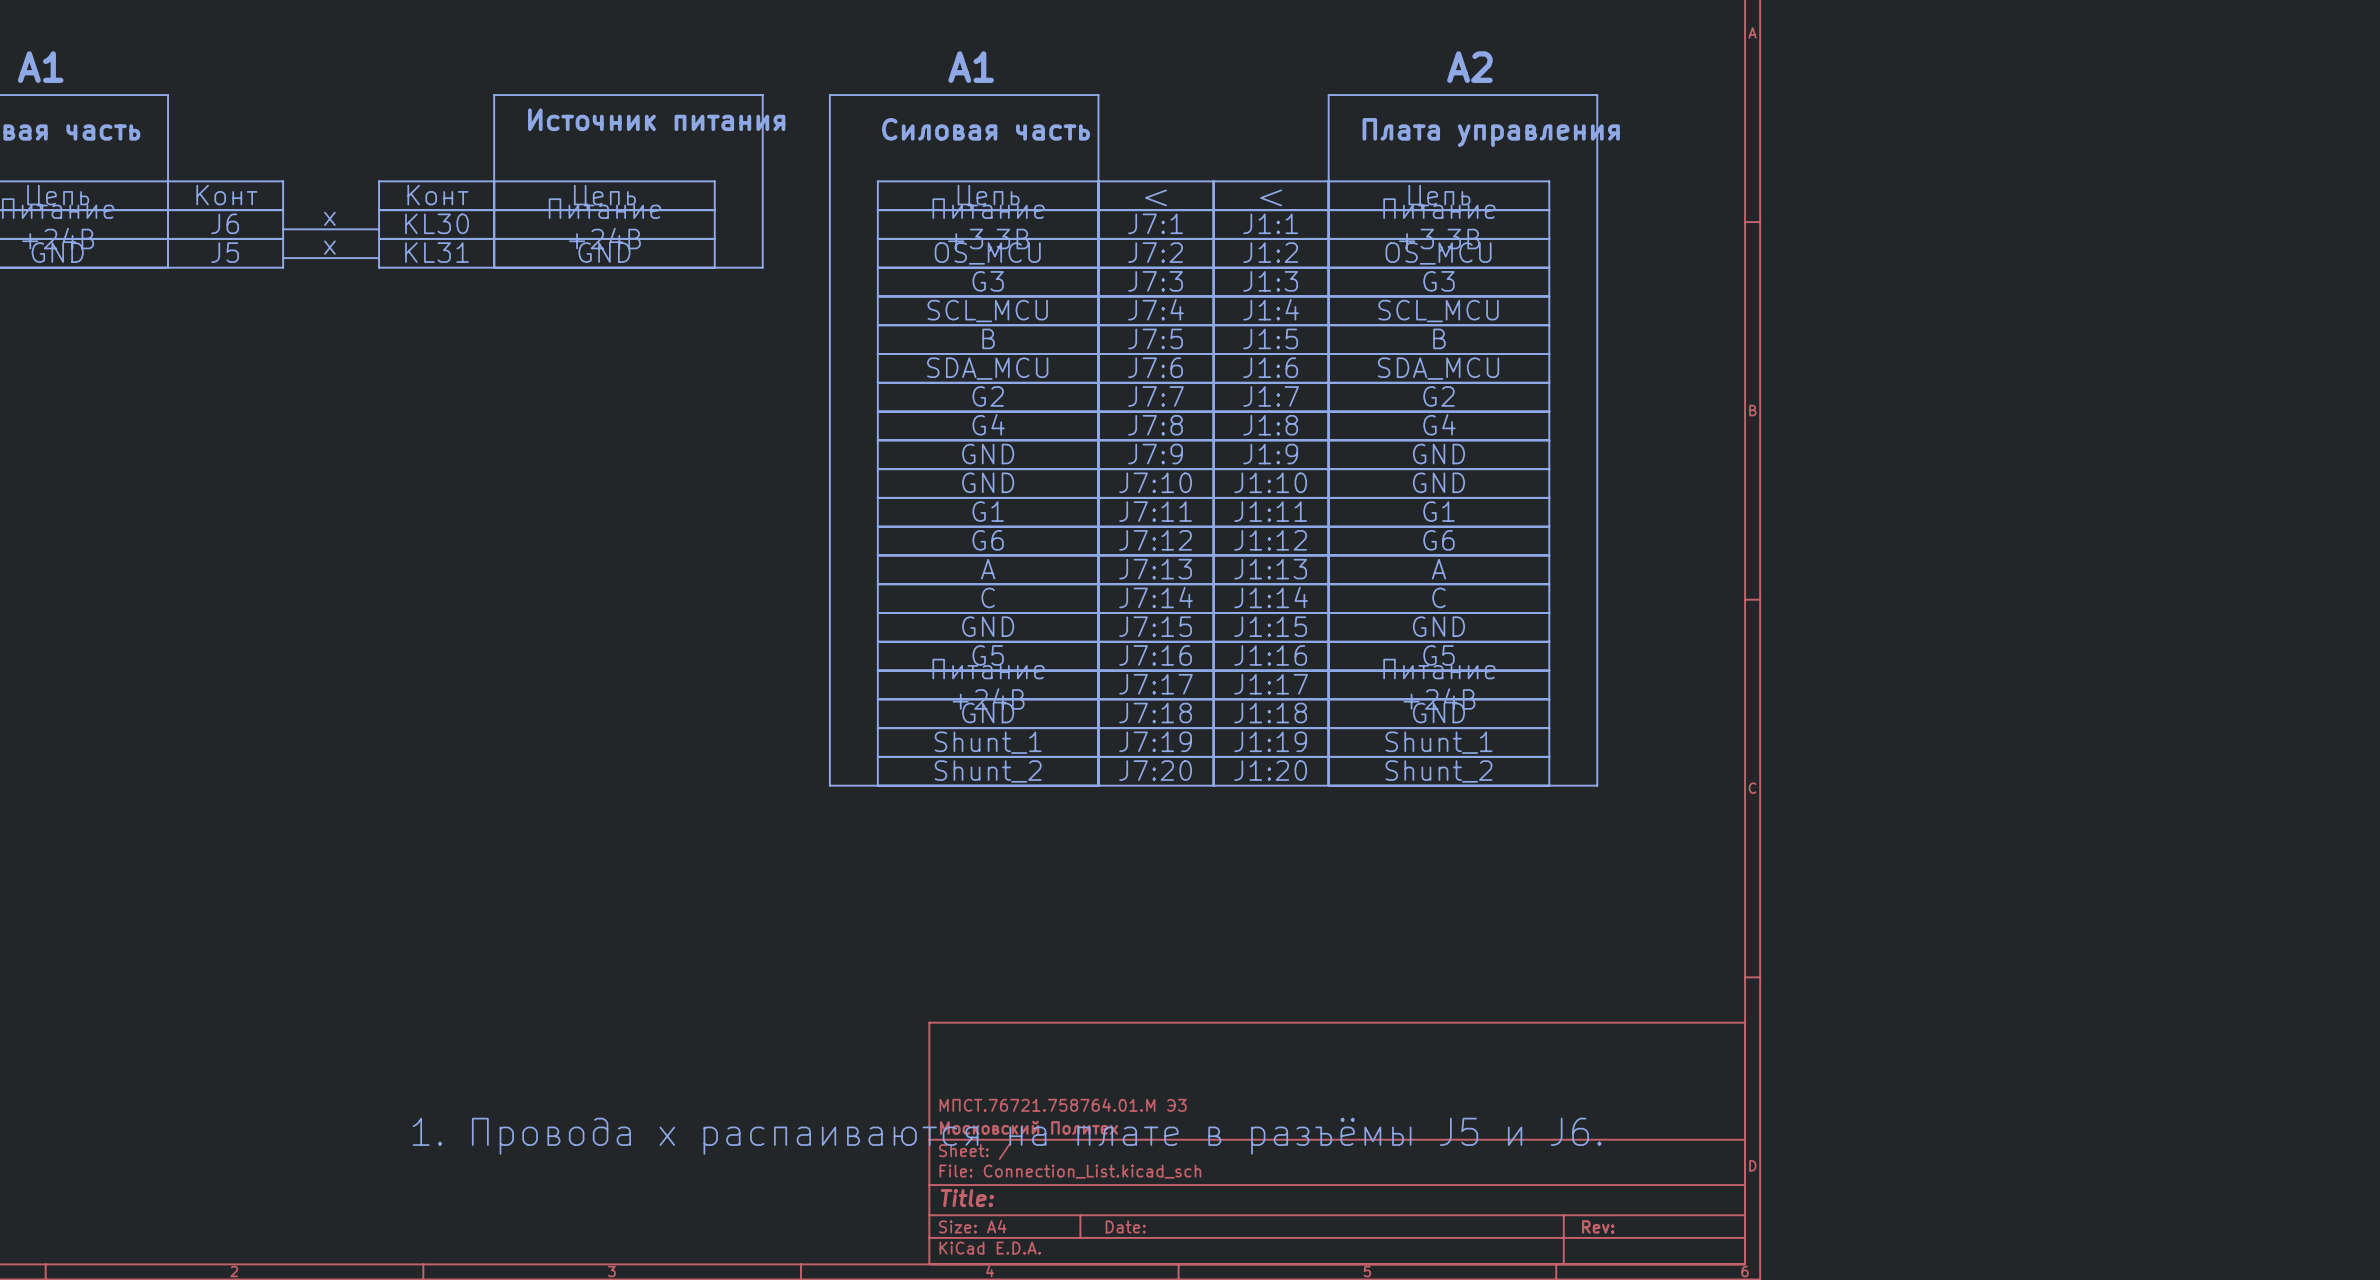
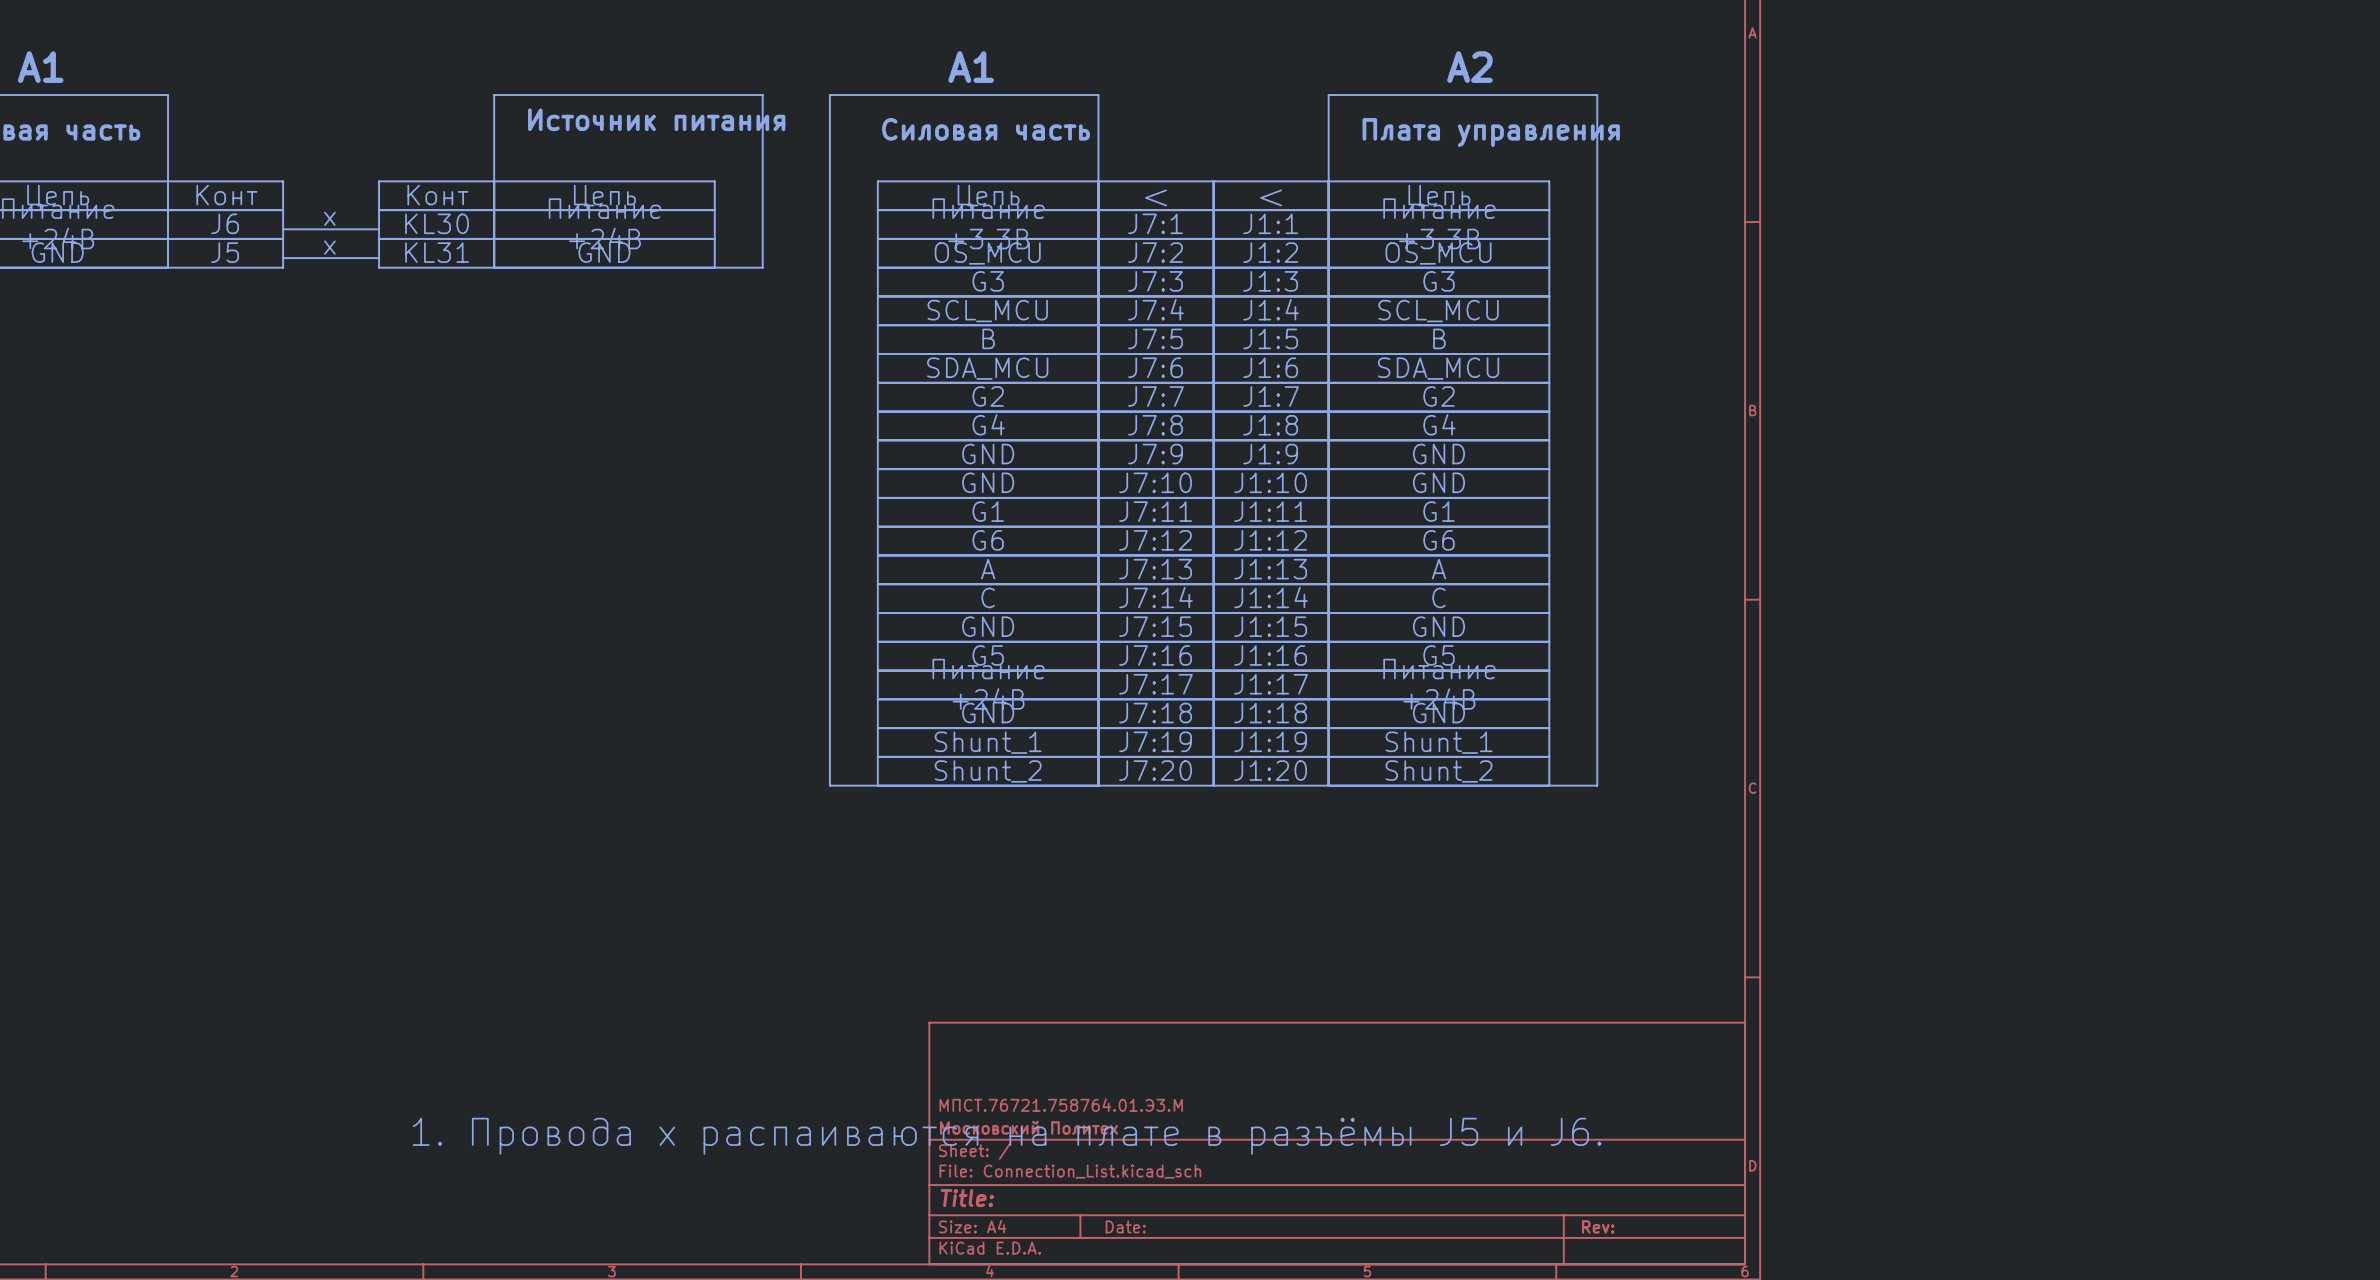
title block: МПСТ.76721.758764.01.М Э3 (1063, 1105) -> МПСТ.76721.758764.01.Э3.М (1061, 1105)

